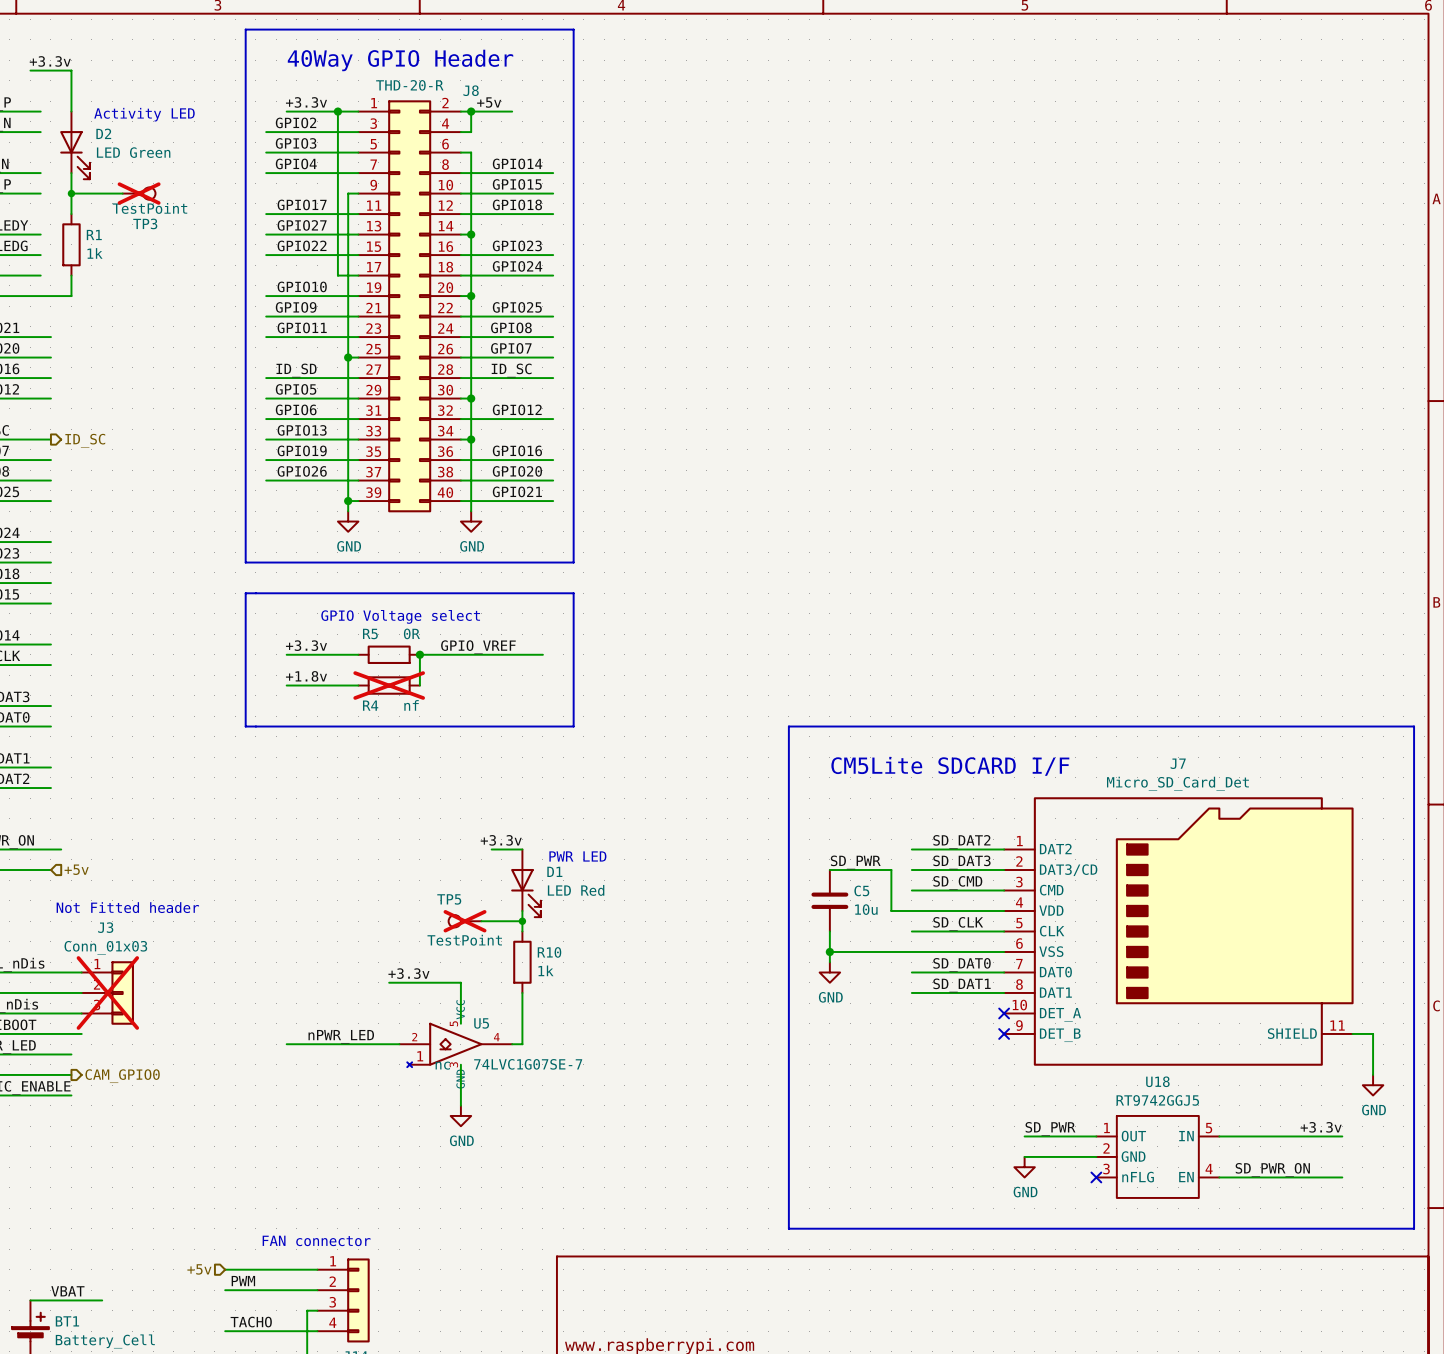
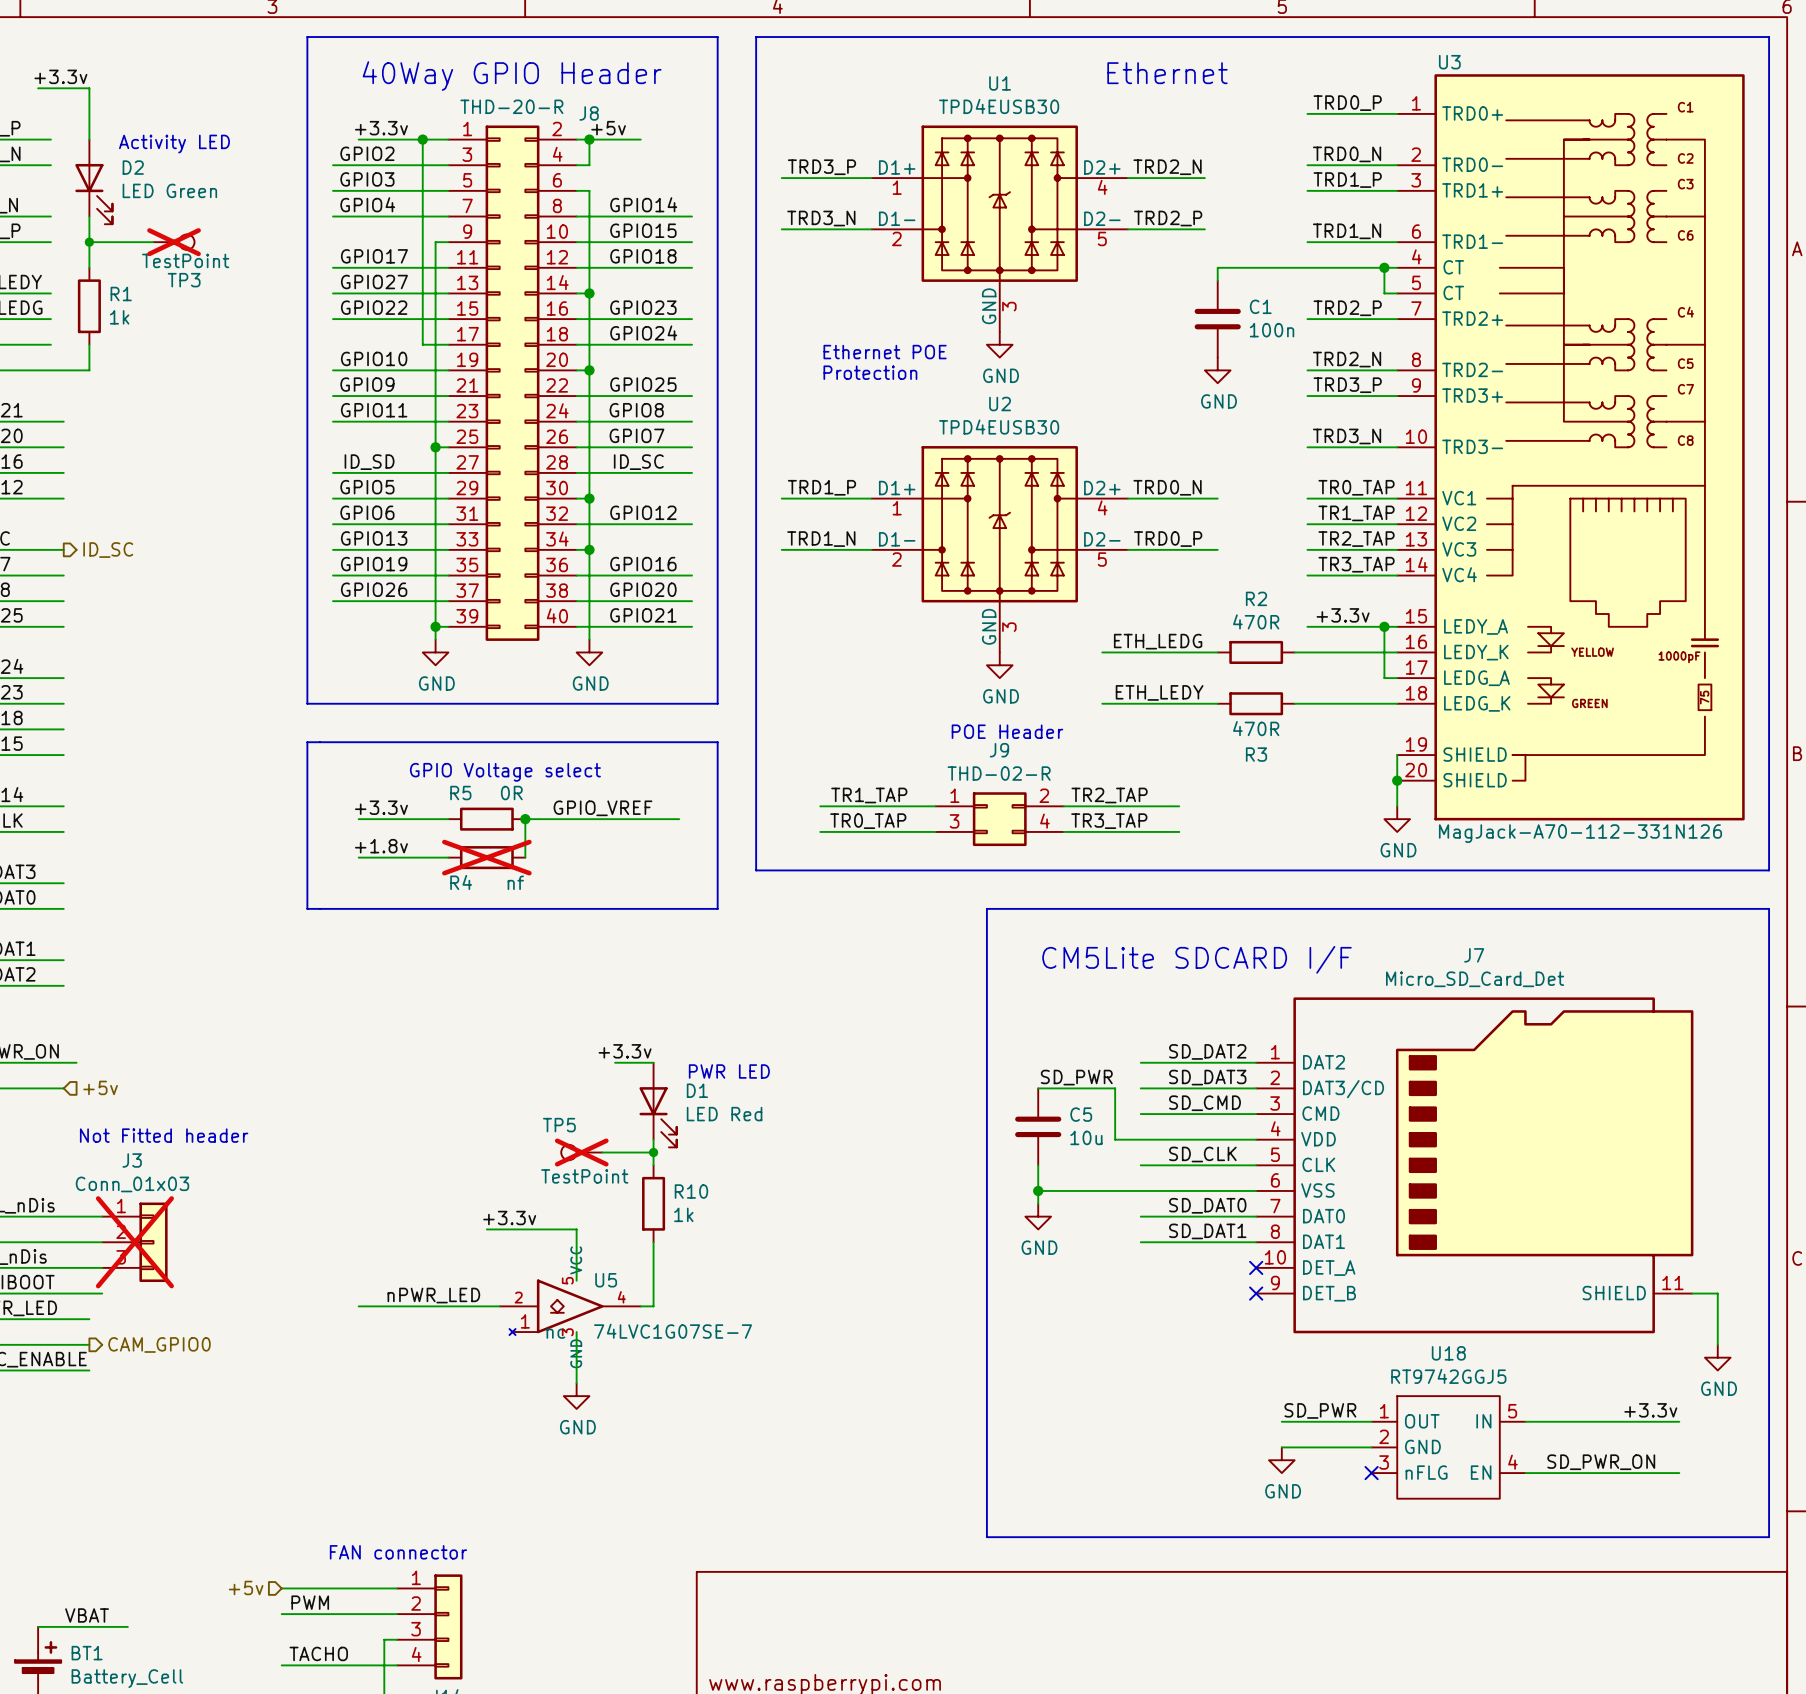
line: none -> (756, 37) (1769, 37) (1769, 870) (756, 870) (756, 37)
text: none -> Ethernet (1167, 73)
label: none -> TRD0_P (1347, 103)
wire: none -> (1307, 113) (1397, 113)
label: none -> TRD0_N (1347, 154)
wire: none -> (1307, 165) (1397, 165)
label: none -> TRD3_P (821, 167)
label: none -> TRD2_N (1167, 167)
wire: none -> (781, 178) (871, 178)
wire: none -> (1127, 178) (1204, 178)
label: none -> TRD1_P (1347, 180)
wire: none -> (1307, 190) (1397, 190)
label: none -> TRD3_N (821, 218)
label: none -> TRD2_P (1168, 218)
U1: none -> TPD4EUSB30 (999, 228)
wire: none -> (781, 229) (871, 229)
wire: none -> (1127, 229) (1204, 229)
label: none -> TRD1_N (1347, 231)
wire: none -> (1307, 242) (1397, 242)
wire: none -> (1384, 267) (1384, 293) (1397, 293)
junction: none -> (1384, 267)
wire: none -> (1397, 267) (1217, 267) (1217, 280)
label: none -> TRD2_P (1347, 308)
C1: none -> 100n (1217, 319)
wire: none -> (1307, 319) (1397, 319)
power symbol: none -> GND (999, 344)
text: none -> Ethernet POE (885, 352)
label: none -> TRD2_N (1347, 359)
power symbol: none -> GND (1217, 370)
wire: none -> (1307, 370) (1397, 370)
text: none -> Protection (870, 372)
label: none -> TRD3_P (1347, 385)
wire: none -> (1307, 396) (1397, 396)
label: none -> TRD3_N (1347, 436)
wire: none -> (1307, 447) (1397, 447)
U3: none -> MagJack-A70-112-331N126 (1570, 447)
label: none -> TRD0_N (1167, 487)
label: none -> TR0_TAP (1356, 487)
label: none -> TRD1_P (821, 487)
wire: none -> (781, 498) (871, 498)
wire: none -> (1127, 498) (1217, 498)
wire: none -> (1307, 498) (1397, 498)
label: none -> TR1_TAP (1356, 513)
wire: none -> (1307, 524) (1397, 524)
label: none -> TRD0_P (1168, 539)
label: none -> TR2_TAP (1356, 539)
label: none -> TRD1_N (821, 539)
wire: none -> (781, 549) (871, 549)
U2: none -> TPD4EUSB30 (999, 549)
wire: none -> (1127, 549) (1217, 549)
wire: none -> (1307, 549) (1397, 549)
label: none -> TR3_TAP (1356, 564)
wire: none -> (1307, 575) (1397, 575)
label: none -> +3.3v (1343, 615)
wire: none -> (1307, 626) (1397, 626)
wire: none -> (1384, 626) (1384, 678) (1397, 678)
junction: none -> (1384, 626)
label: none -> ETH_LEDG (1158, 641)
wire: none -> (1102, 652) (1217, 652)
R2: none -> 470R (1256, 652)
wire: none -> (1294, 652) (1397, 652)
power symbol: none -> GND (999, 665)
label: none -> ETH_LEDY (1159, 692)
wire: none -> (1102, 703) (1217, 703)
R3: none -> 470R (1256, 703)
wire: none -> (1294, 703) (1397, 703)
text: none -> POE Header (1007, 731)
wire: none -> (1397, 755) (1397, 806)
junction: none -> (1397, 780)
label: none -> TR2_TAP (1109, 795)
label: none -> TR1_TAP (869, 795)
wire: none -> (820, 806) (935, 806)
wire: none -> (1063, 806) (1179, 806)
J9: none -> THD-02-R (999, 819)
power symbol: none -> GND (1397, 819)
label: none -> TR0_TAP (868, 821)
label: none -> TR3_TAP (1109, 821)
wire: none -> (820, 831) (935, 831)
wire: none -> (1063, 831) (1179, 831)

